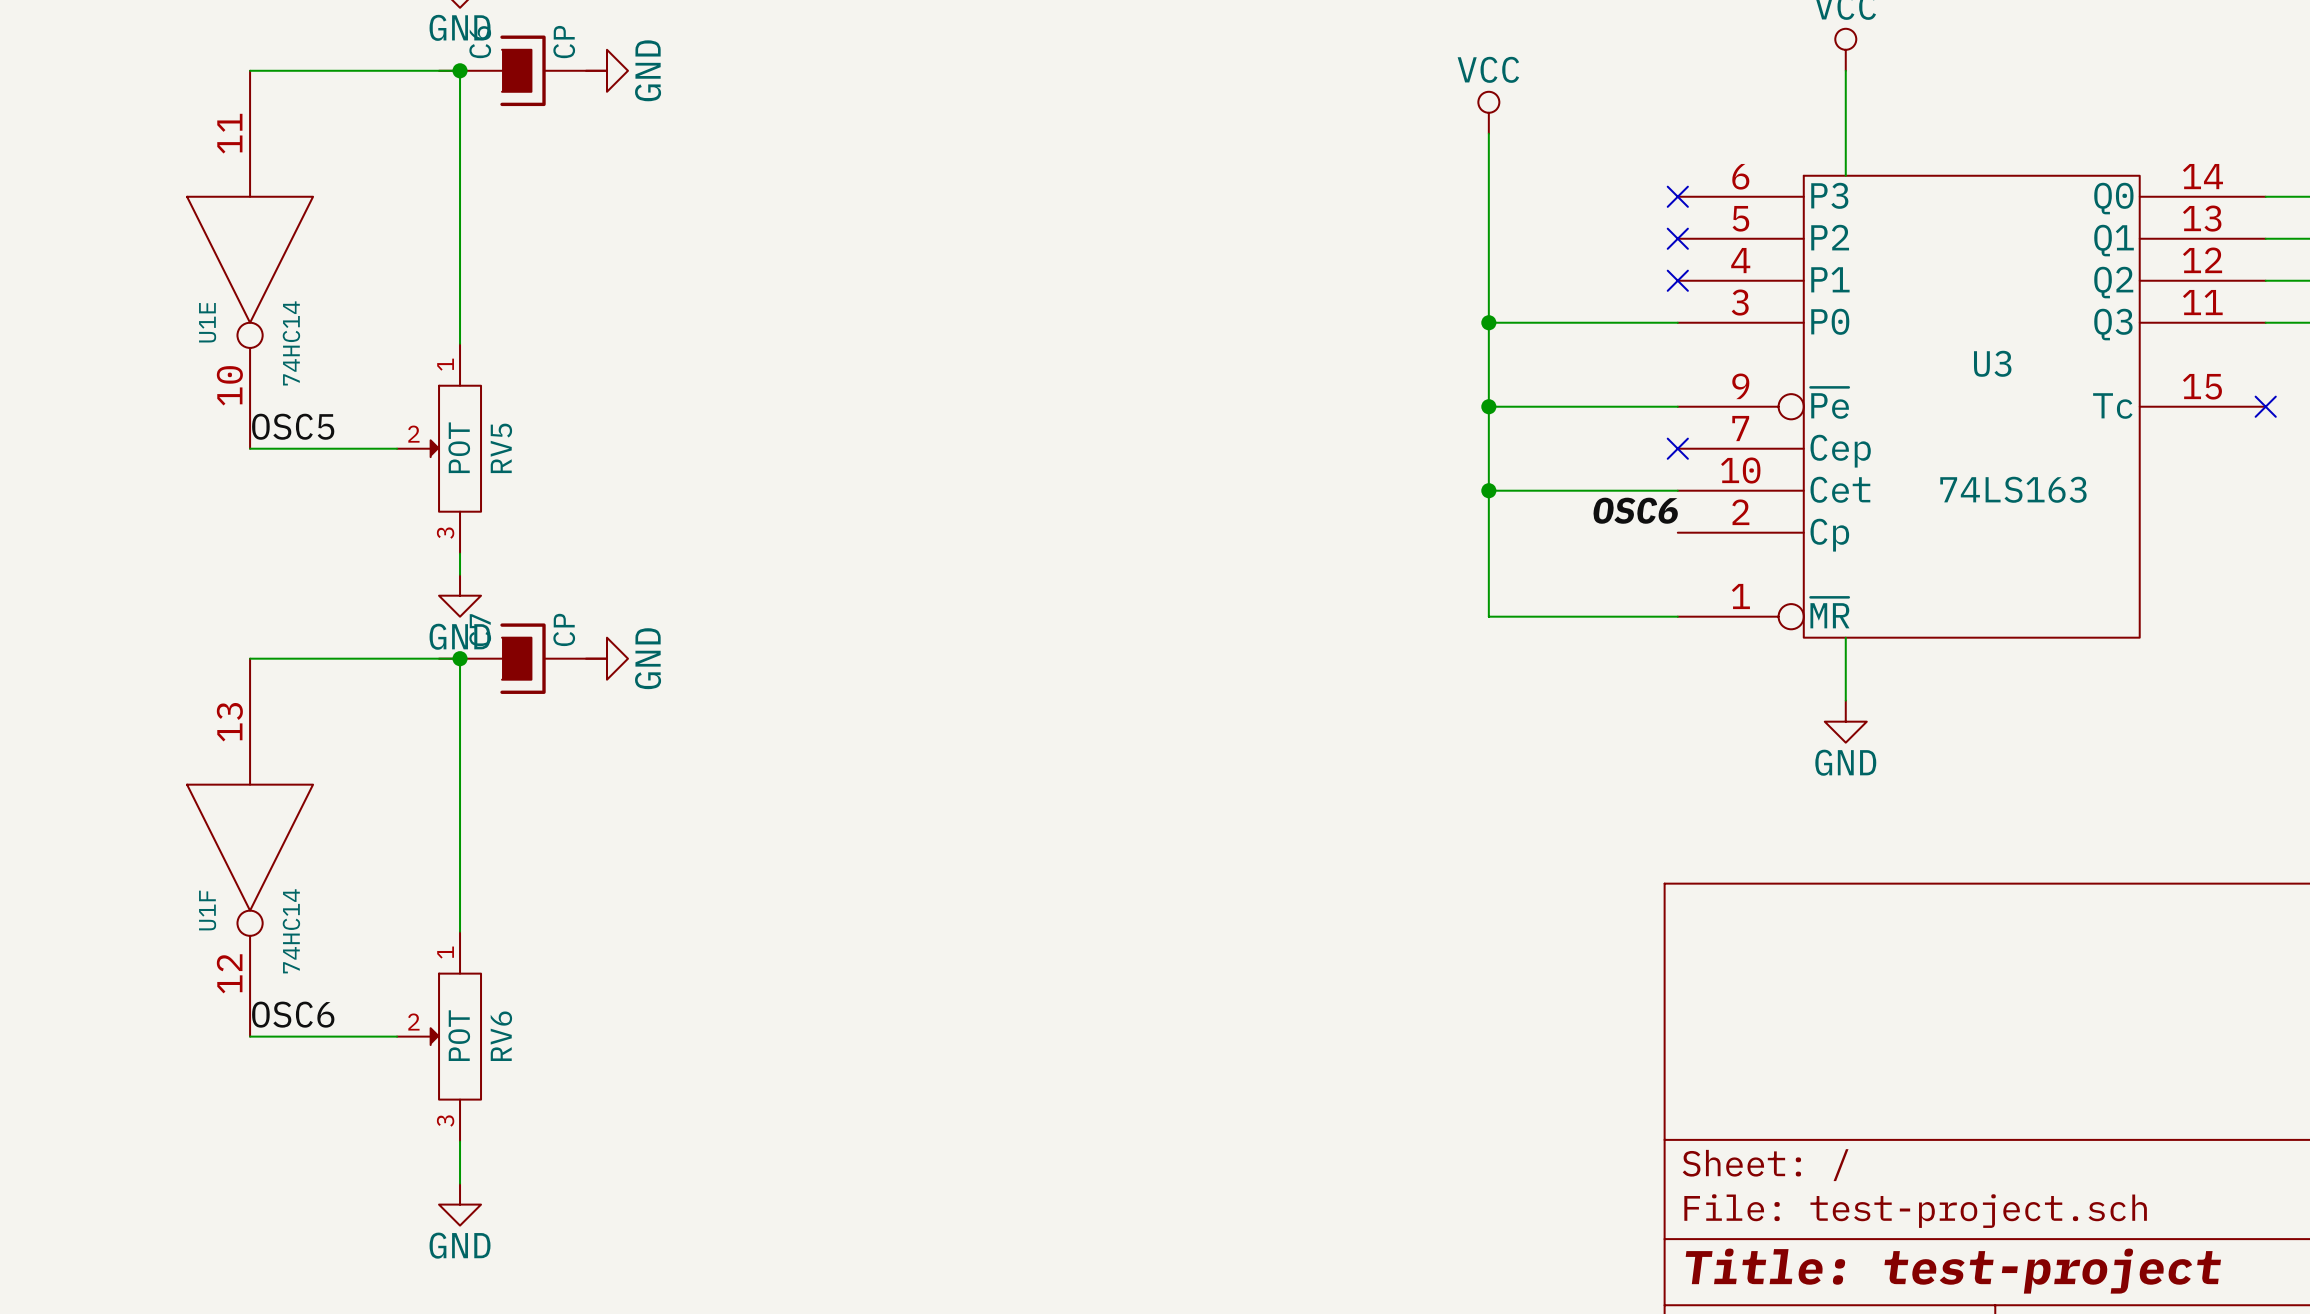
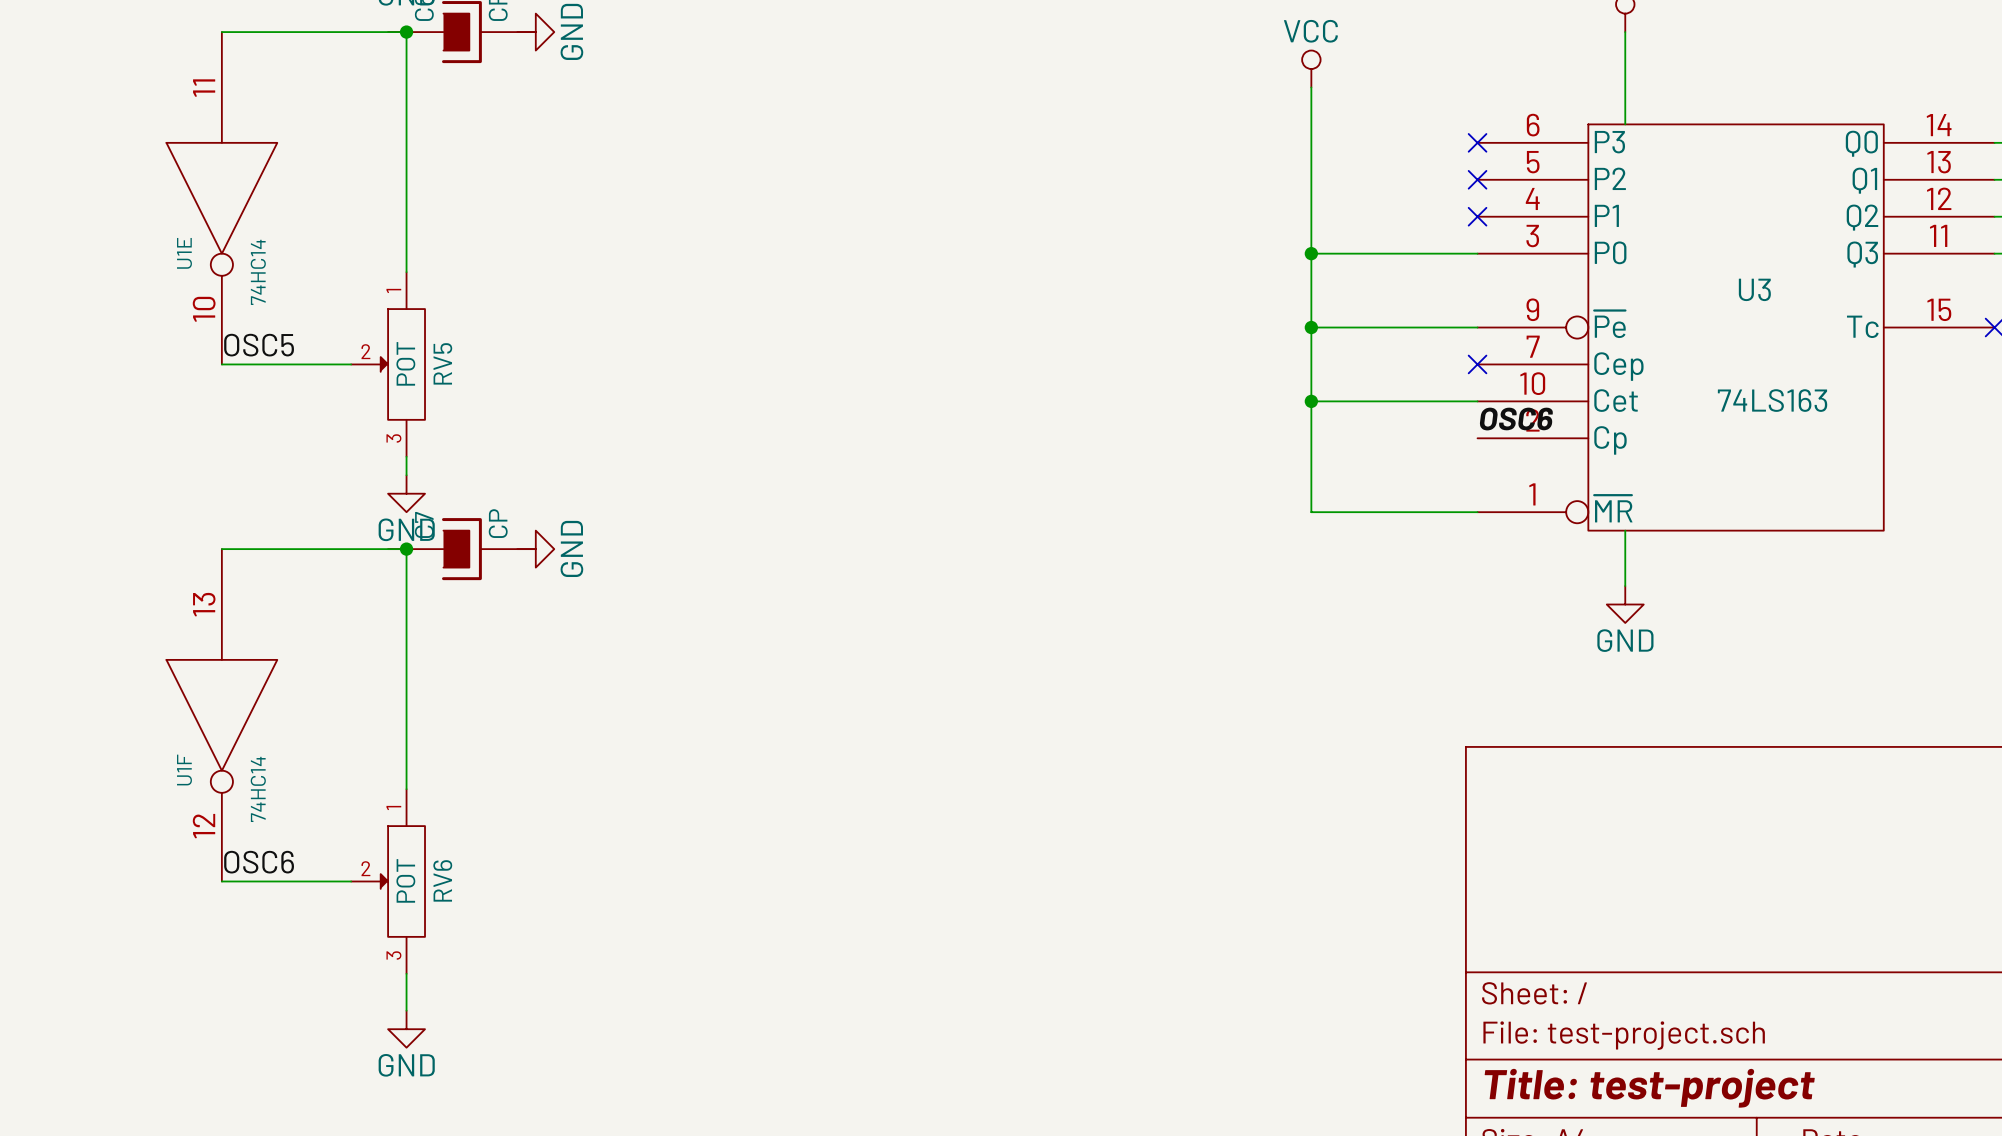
label position: OSC6 (1635, 510) -> OSC6 (1516, 419)

